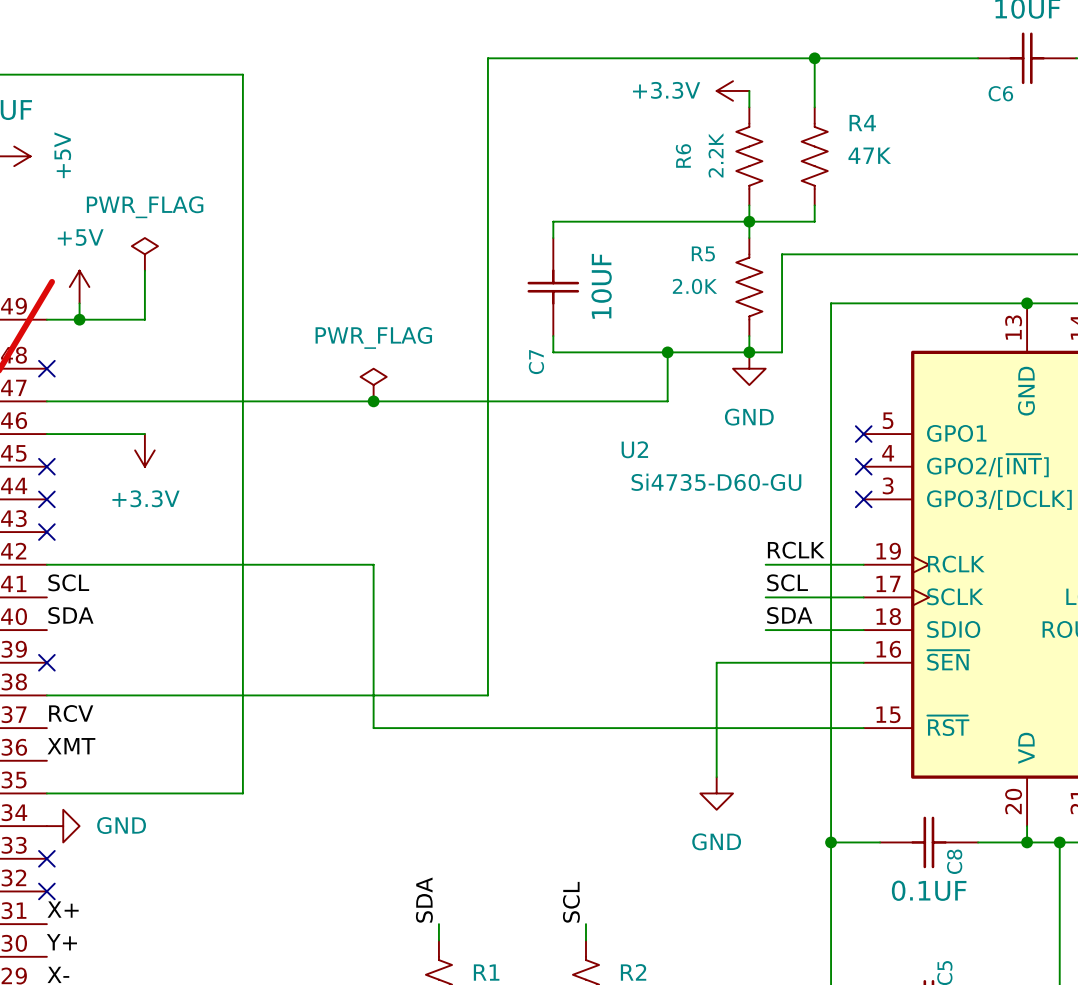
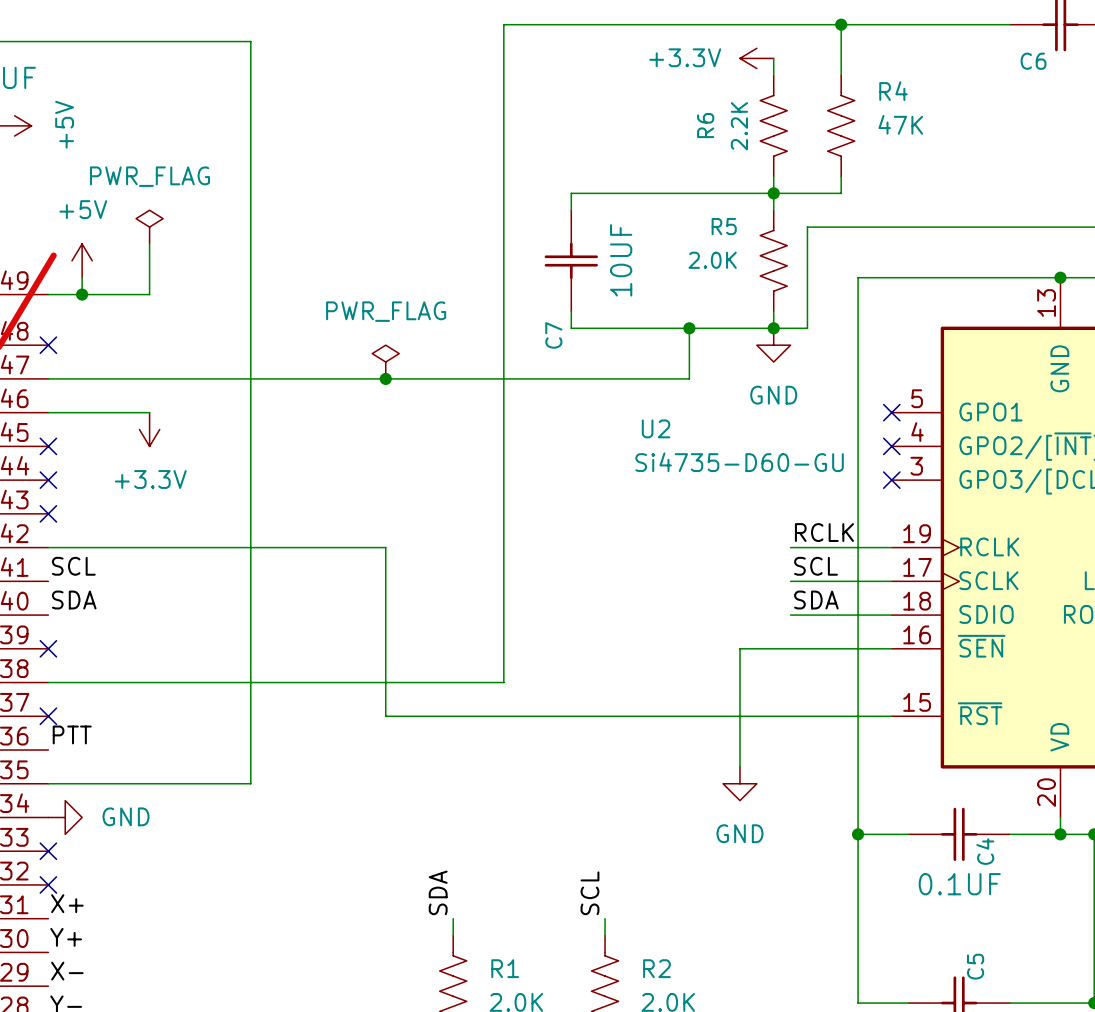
label: RCV (71, 713) -> none
no-connect mark: none -> (48, 716)
label: XMT (71, 746) -> PTT (72, 734)
C8 name: C8 (954, 861) -> C4 (985, 851)

